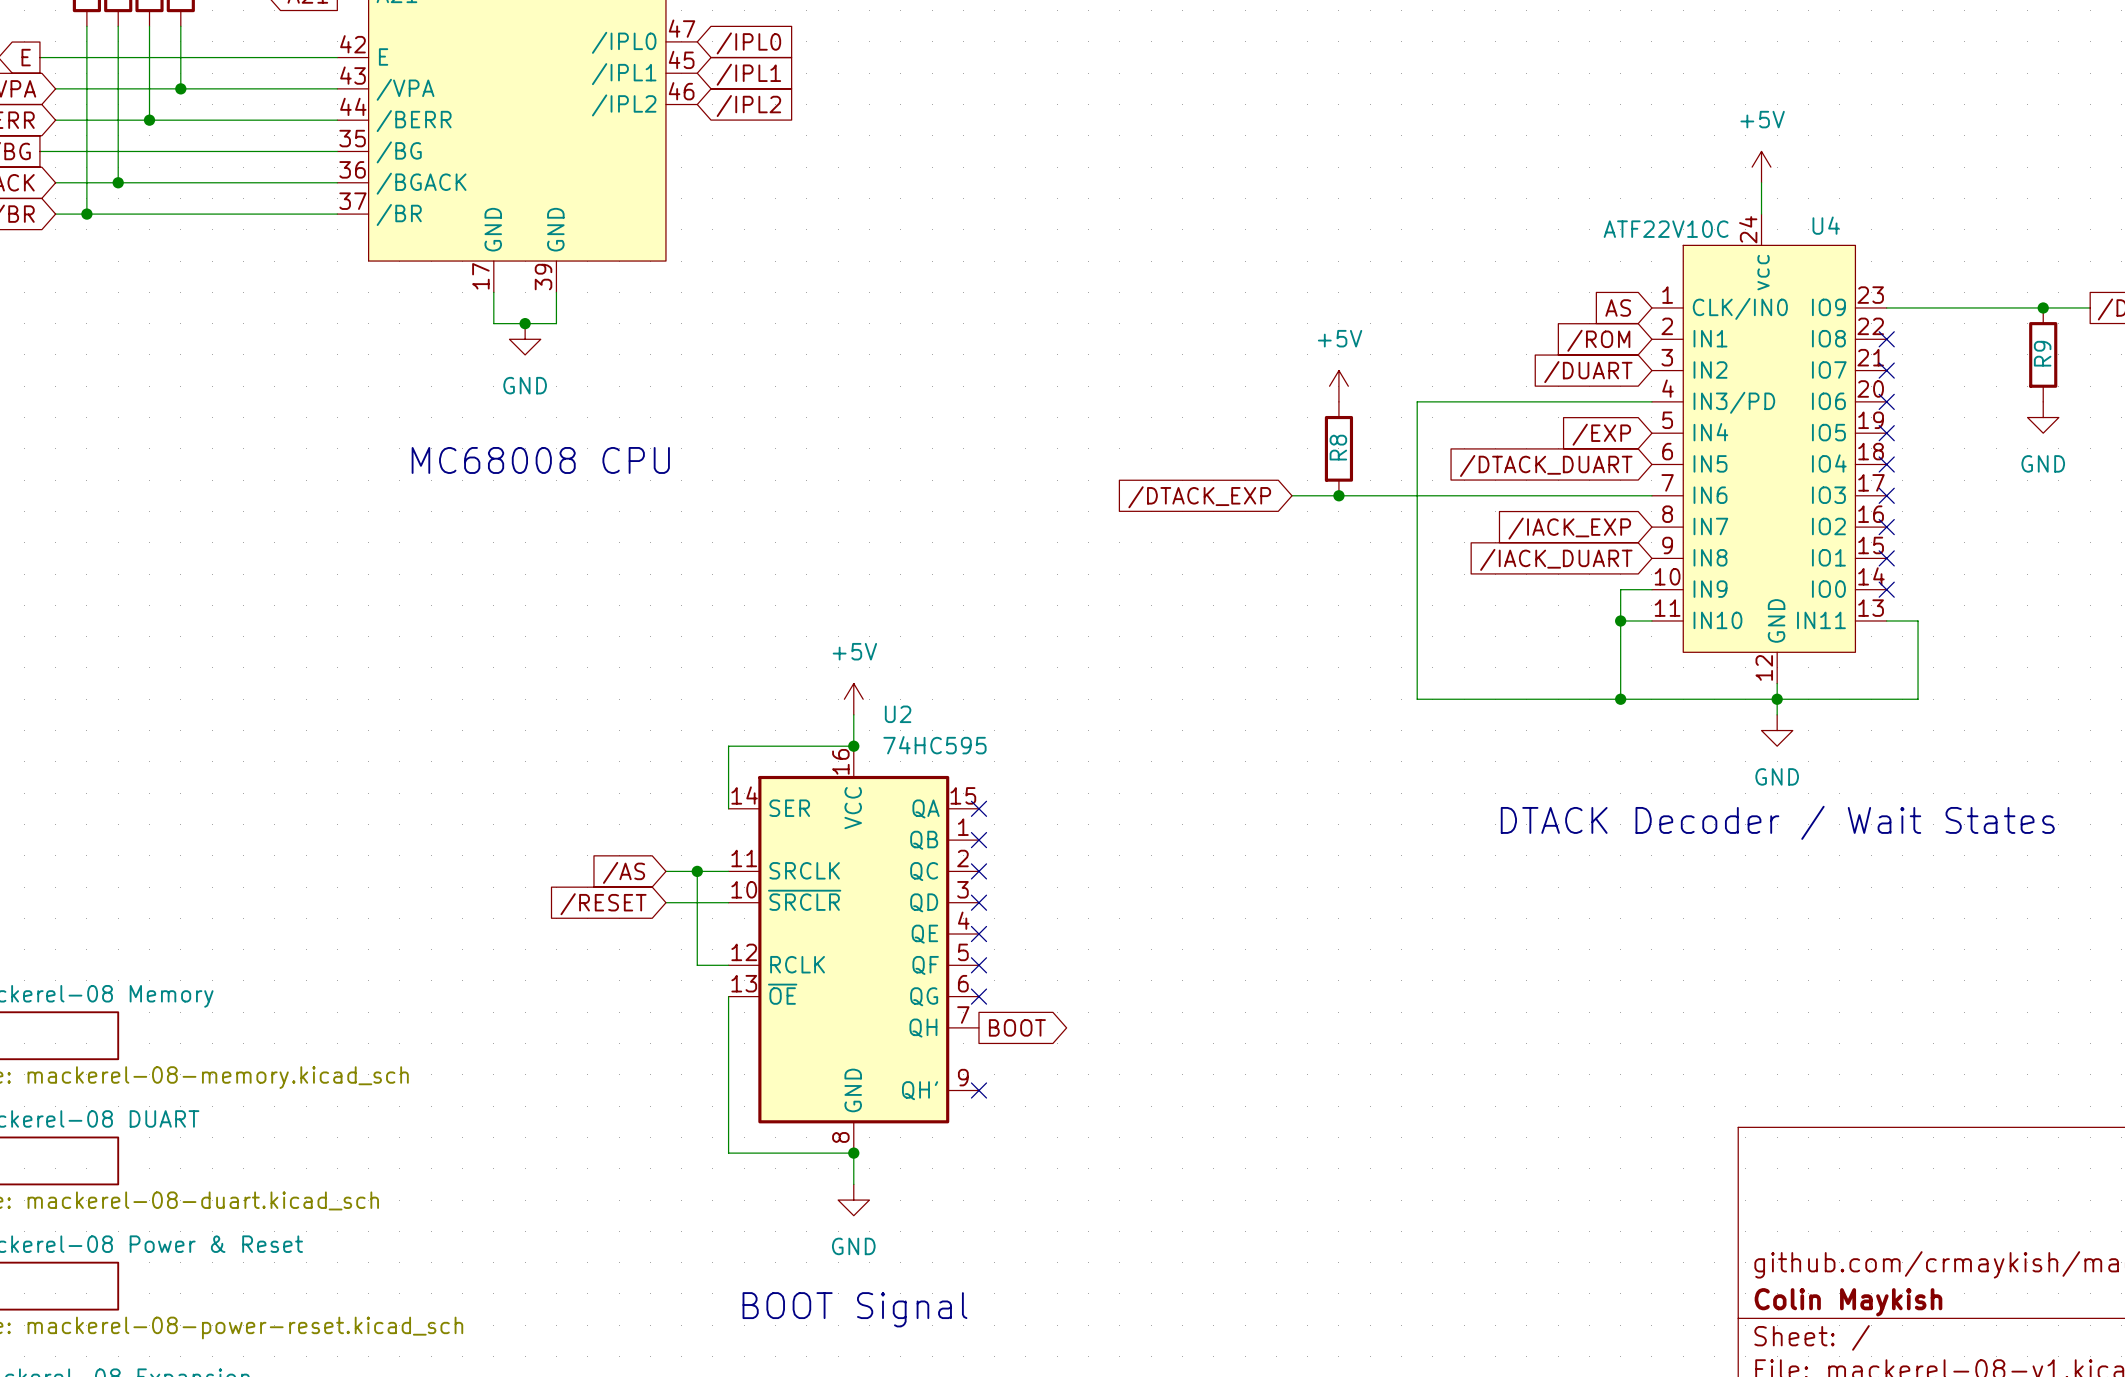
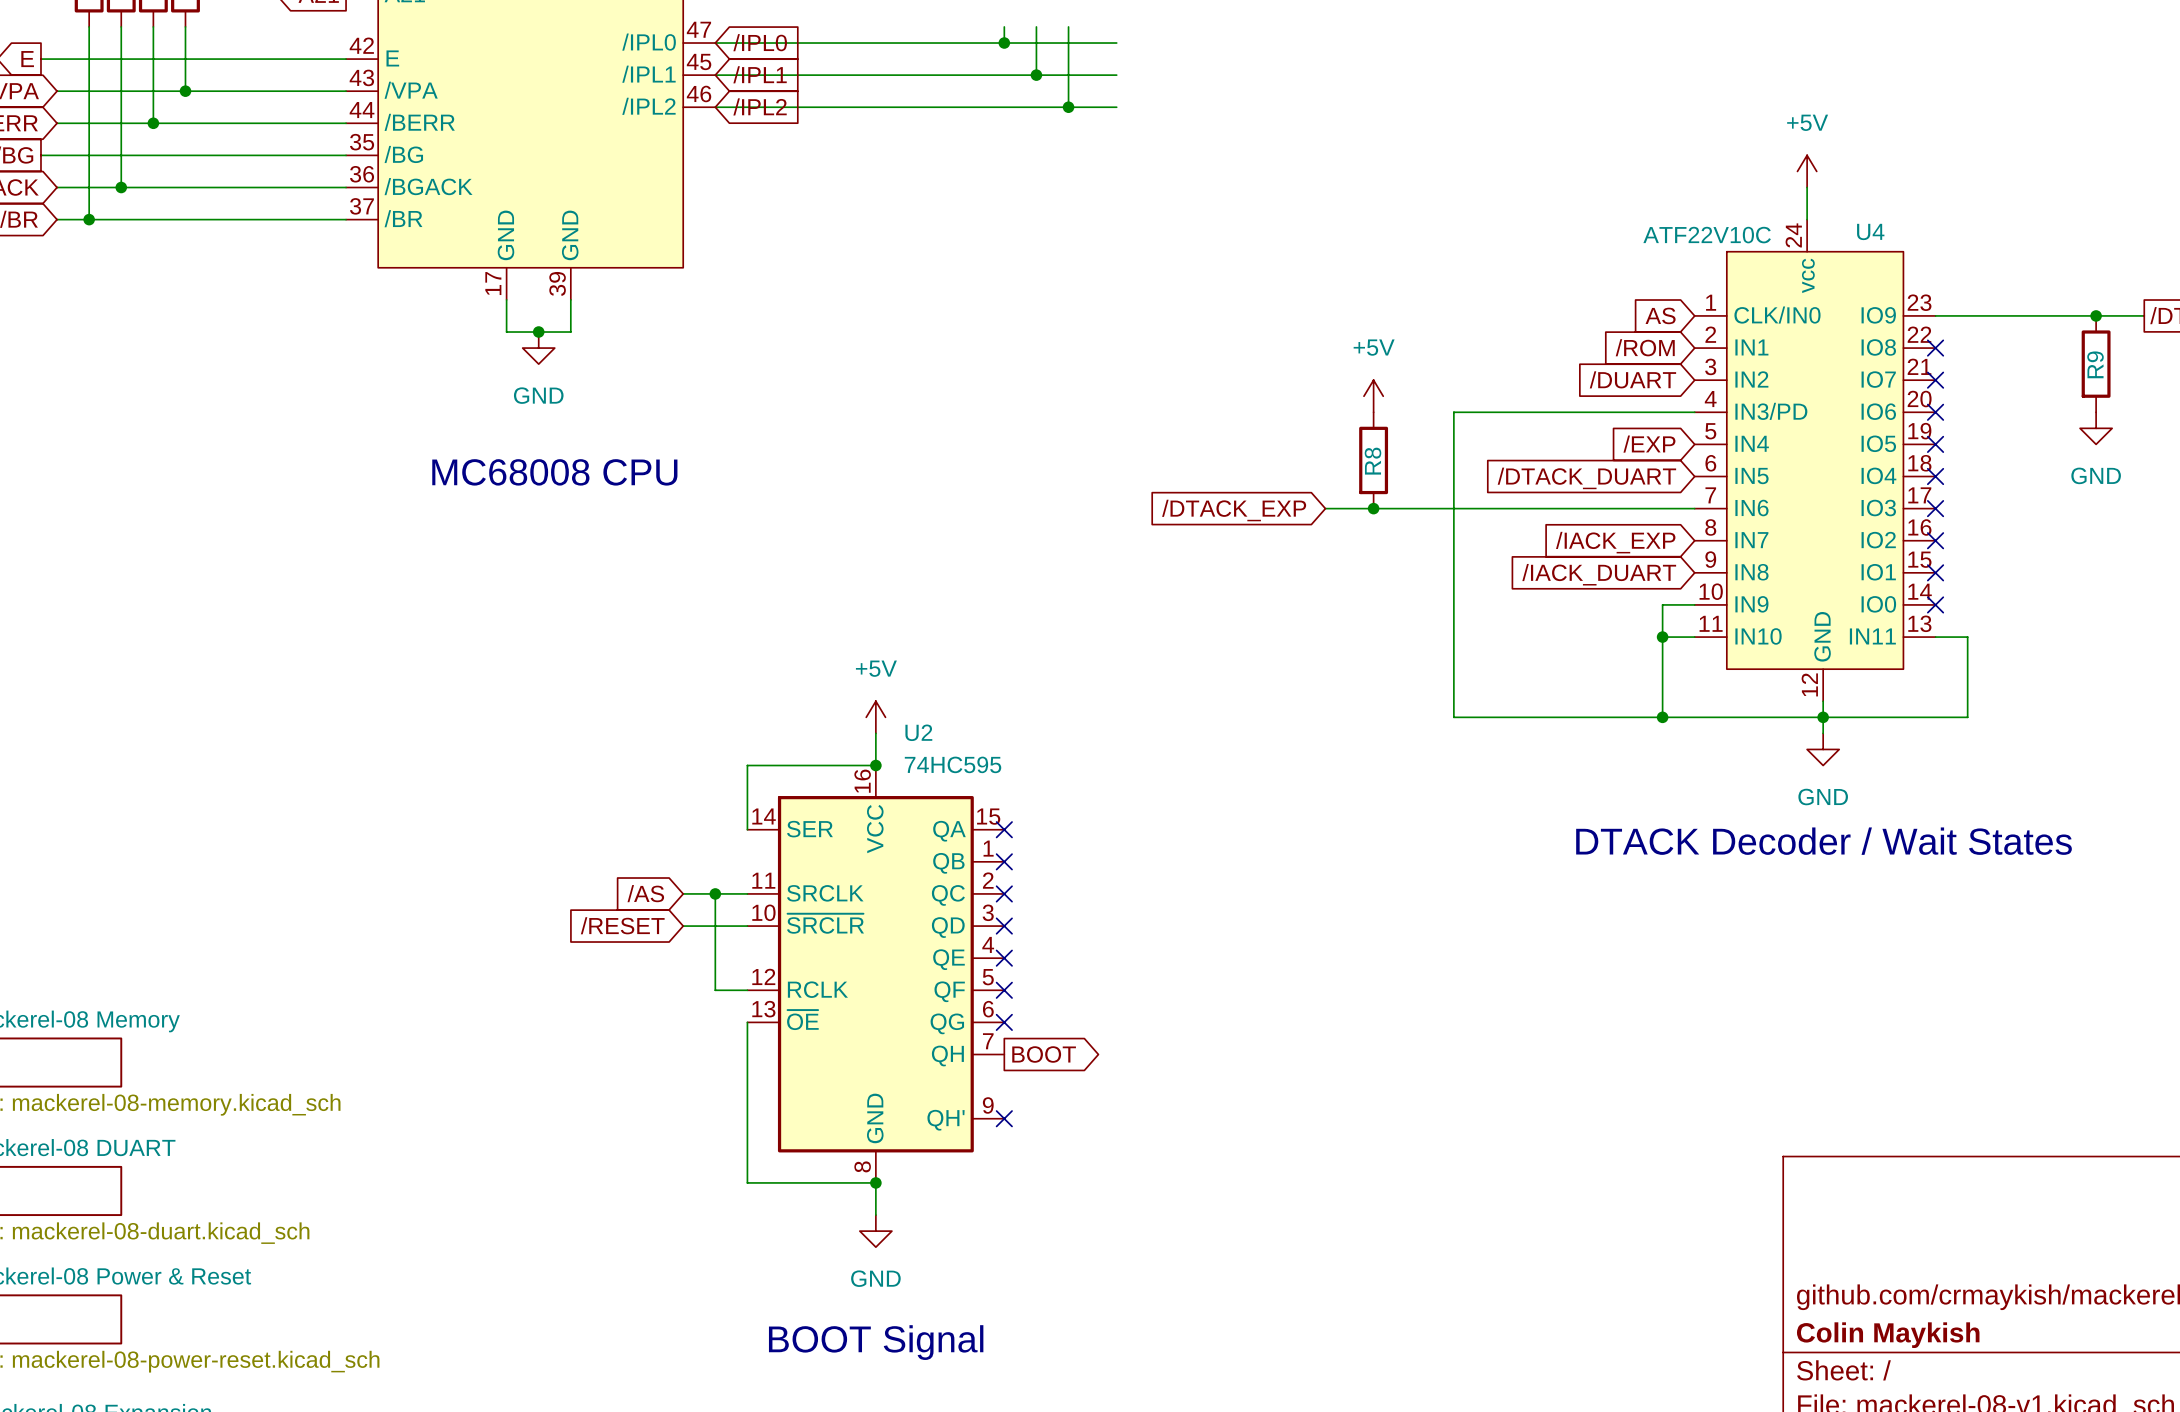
wire: none -> (1004, 26) (1004, 43)
wire: none -> (1036, 26) (1036, 75)
wire: none -> (1068, 26) (1068, 107)
wire: none -> (715, 43) (1116, 43)
junction: none -> (1004, 43)
wire: none -> (715, 75) (1116, 75)
junction: none -> (1036, 75)
wire: none -> (715, 107) (1116, 107)
junction: none -> (1068, 107)

